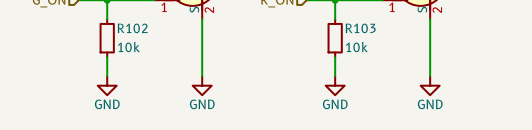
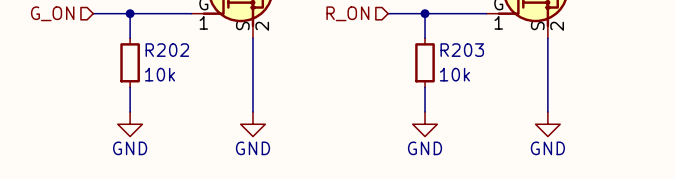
R102 name: R102 (132, 28) -> R202 (167, 50)
R103 name: R103 (360, 28) -> R203 (462, 50)

